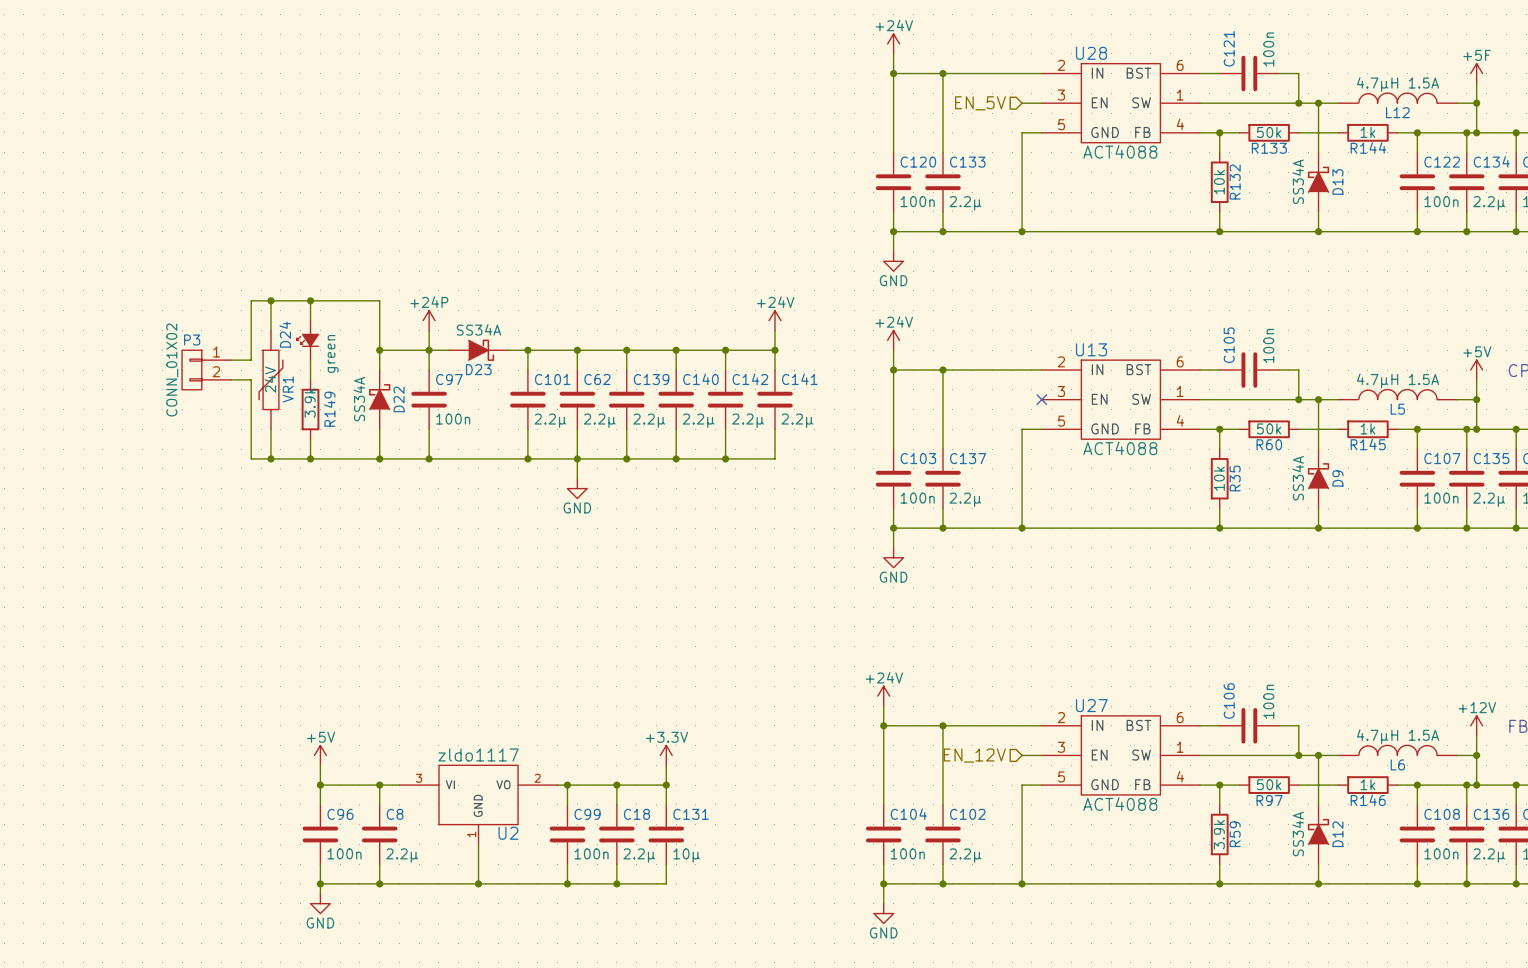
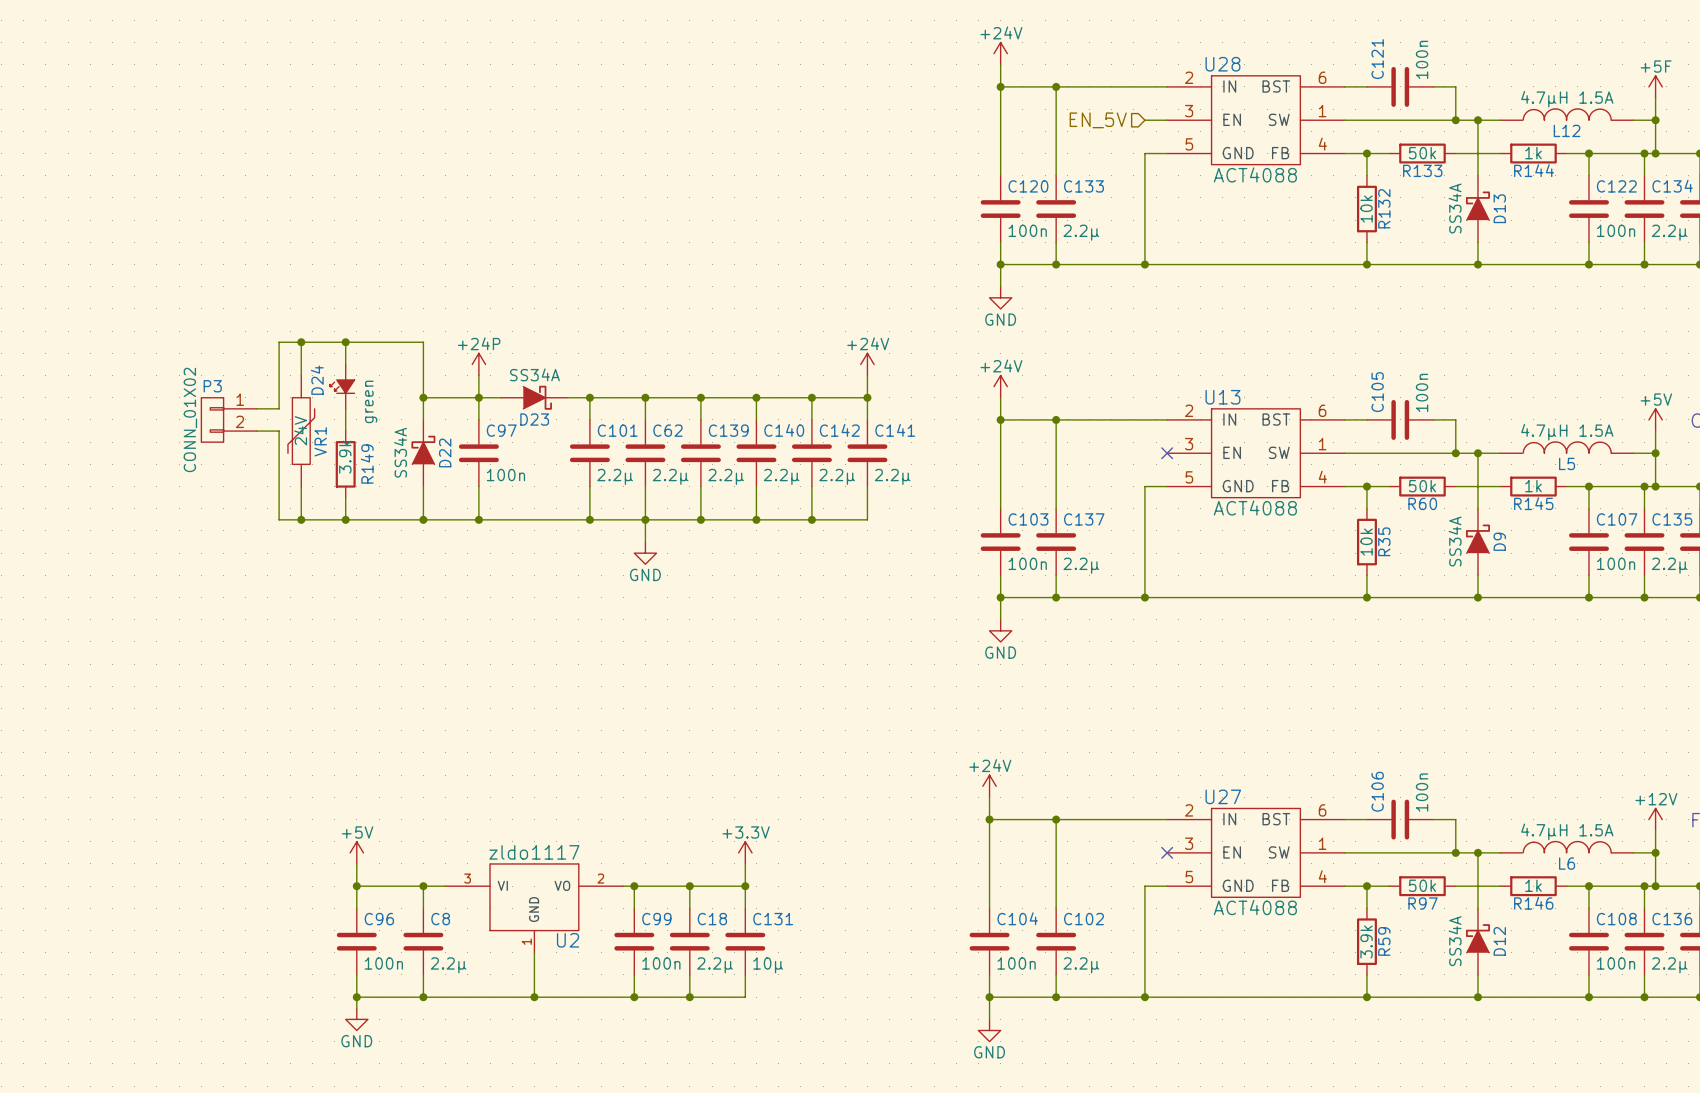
hierarchical label: EN_12V (974, 755) -> none
wire: (1022, 755) (1041, 755) -> none
no-connect mark: none -> (1167, 852)

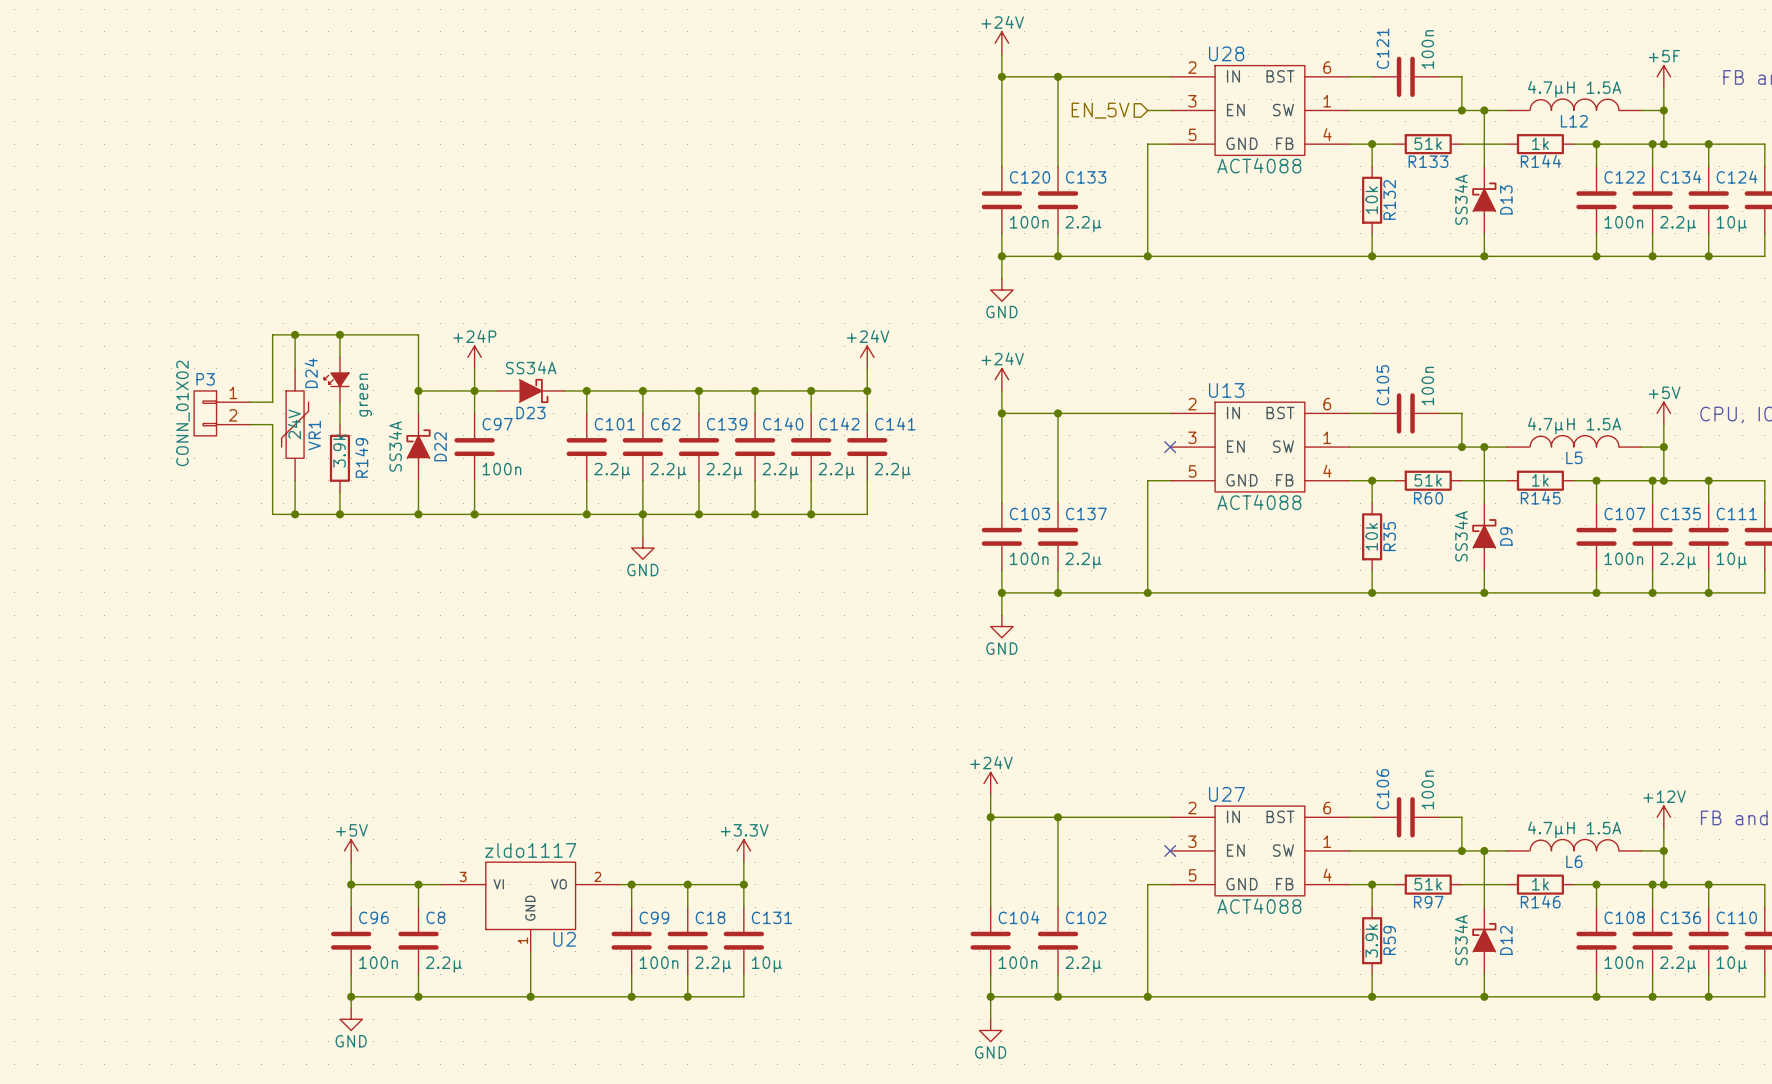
R133 value: 50k (1422, 153) -> 51k (1428, 143)
R60 value: 50k (1422, 486) -> 51k (1428, 480)
R97 value: 50k (1422, 885) -> 51k (1428, 884)

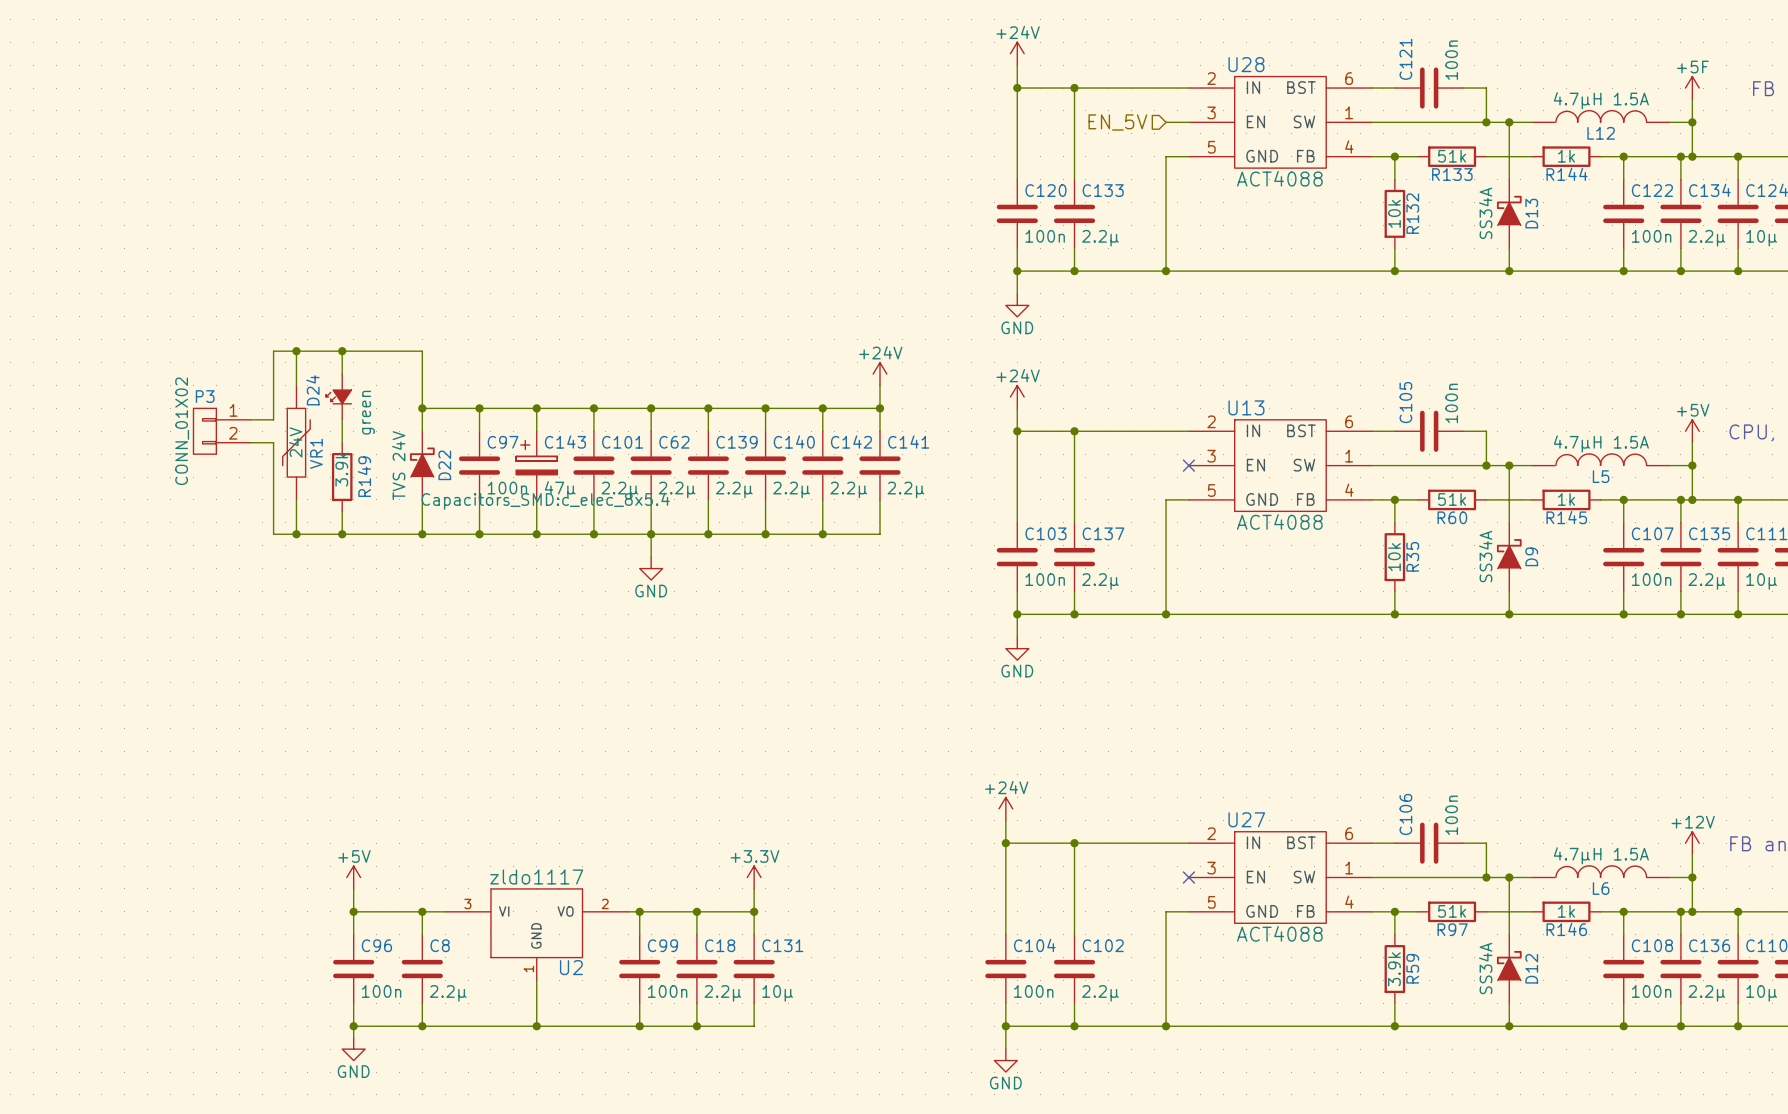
power symbol: +24P (474, 357) -> none
wire: (474, 368) (474, 390) -> (536, 408) (536, 431)
D23: SS34A (530, 390) -> none
junction: none -> (536, 408)
D22 value: SS34A (395, 446) -> TVS 24V (398, 465)
C143: none -> 47µ (536, 465)
wire: none -> (536, 499) (536, 534)
junction: none -> (536, 534)

